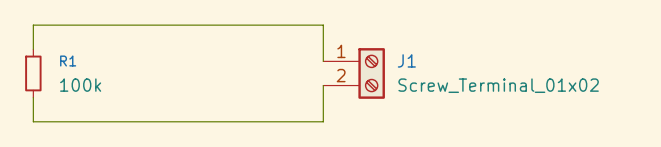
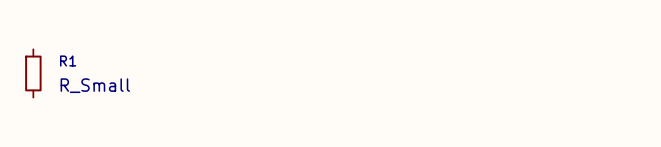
wire: (33, 49) (33, 25) (323, 25) (323, 61) -> none
J1: Screw_Terminal_01x02 (354, 73) -> none
R1 value: 100k (80, 85) -> R_Small (95, 85)
wire: (323, 85) (323, 121) (33, 121) (33, 97) -> none

